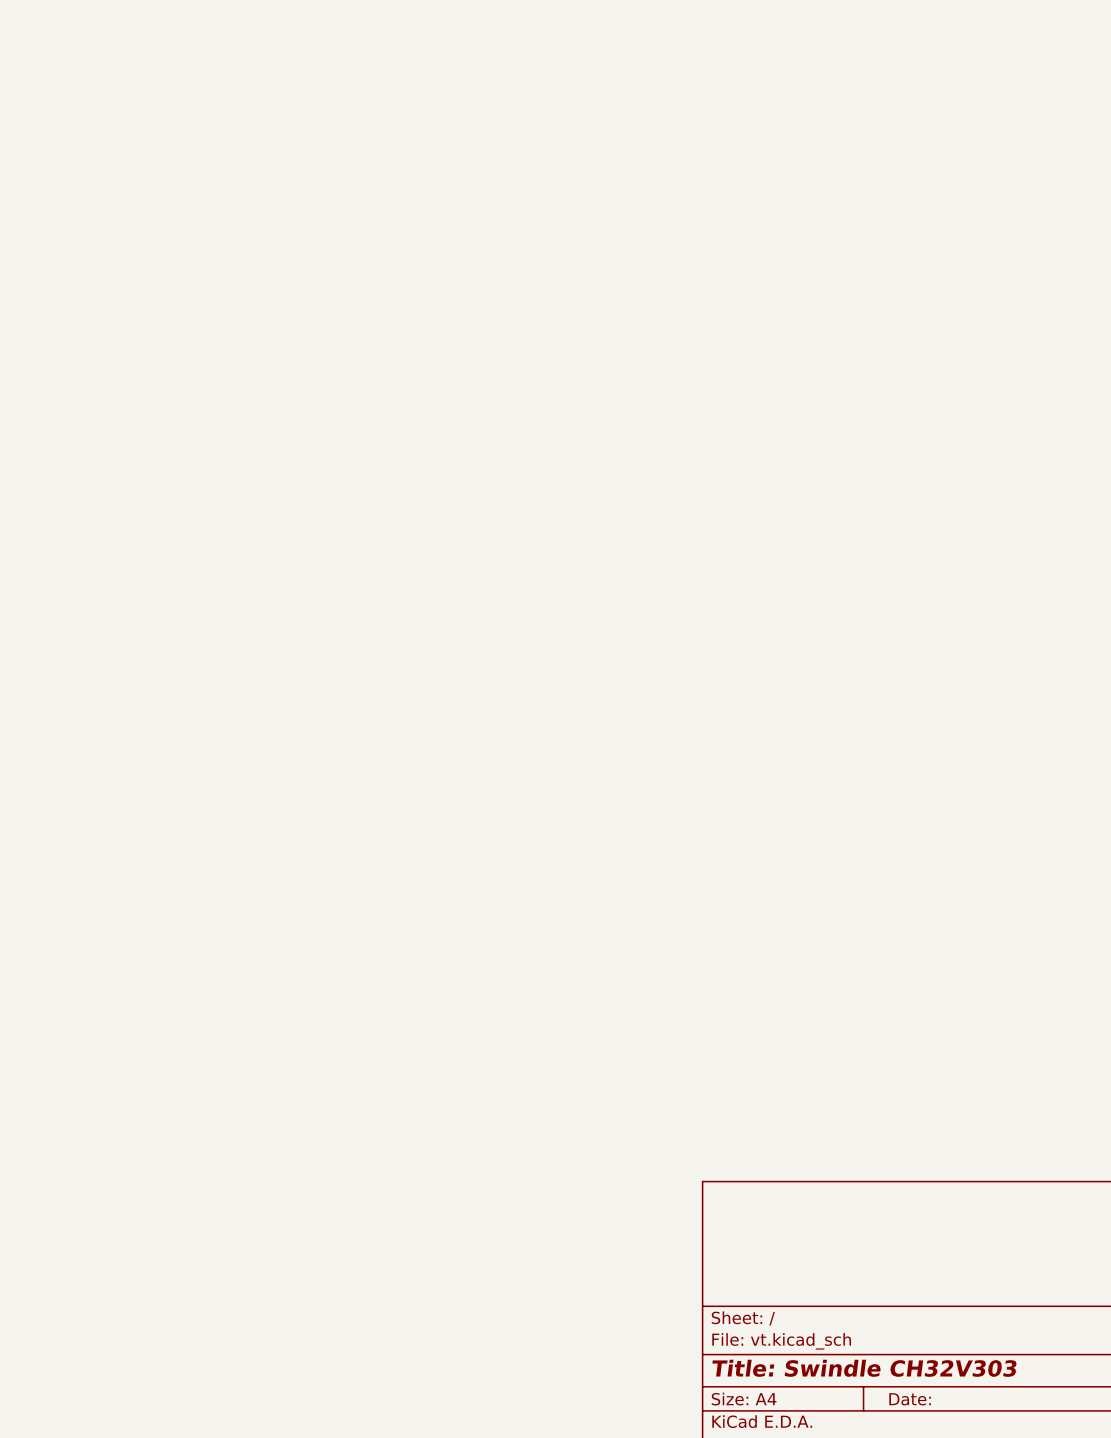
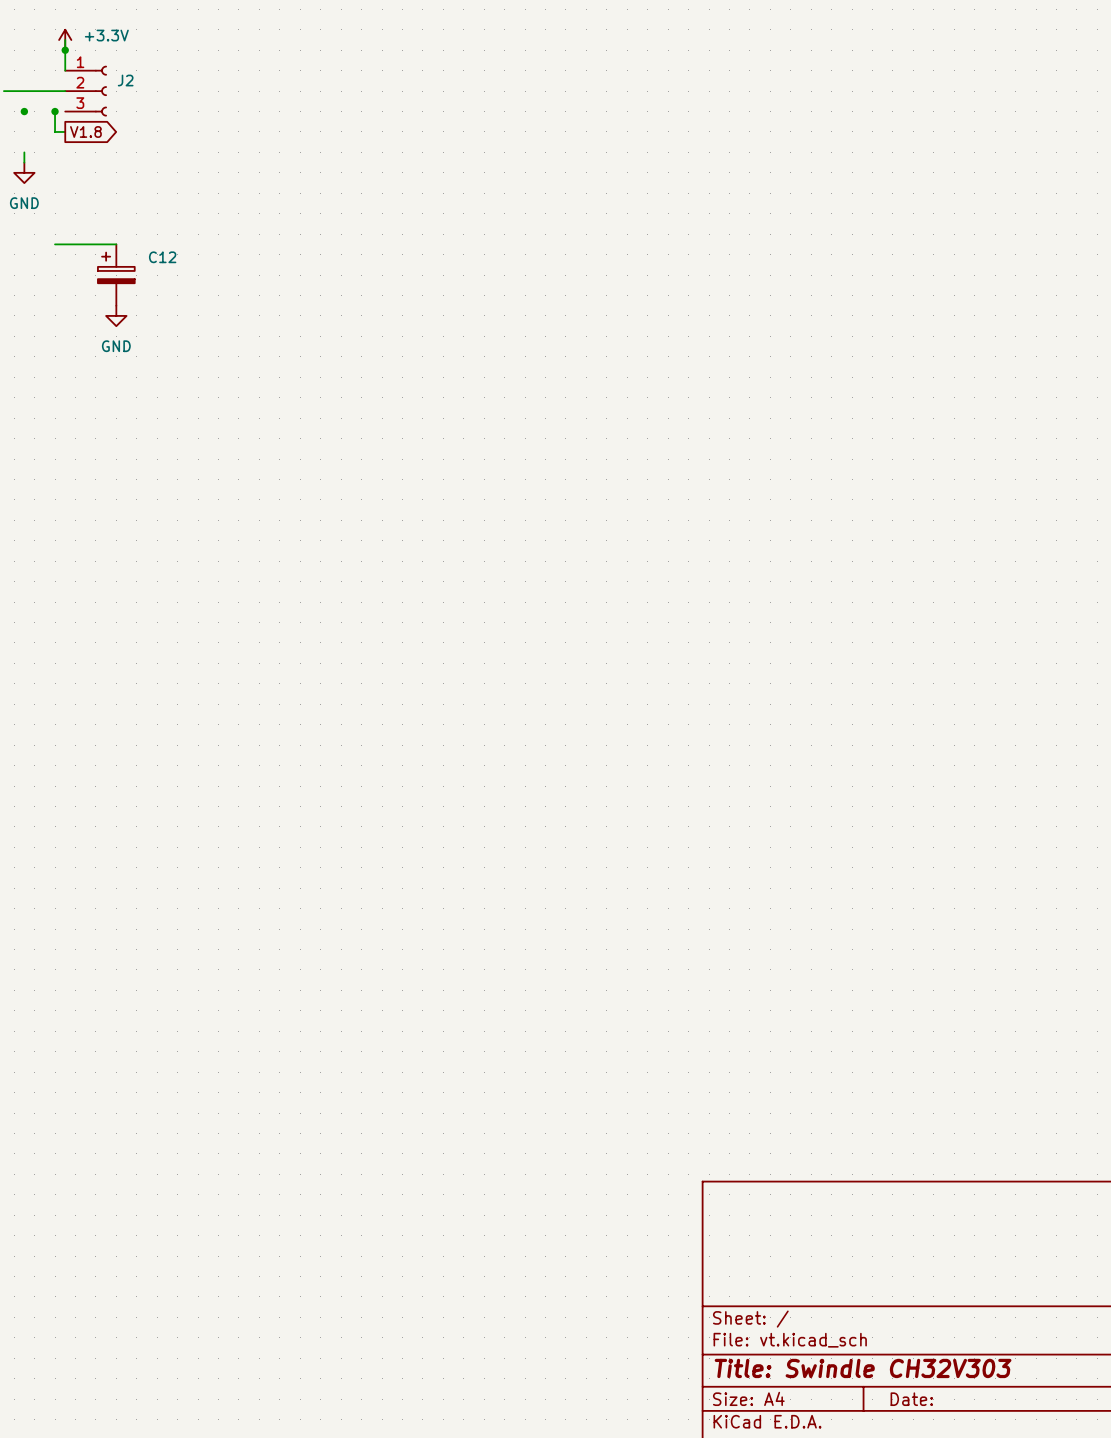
wire: none -> (65, 40) (65, 70)
power symbol: none -> +3.3V (65, 40)
junction: none -> (65, 50)
wire: none -> (3, 91) (65, 91)
J2: none -> (85, 91)
junction: none -> (24, 111)
wire: none -> (55, 111) (55, 131) (65, 131)
junction: none -> (55, 111)
global label: none -> V1.8 (85, 131)
wire: none -> (24, 152) (24, 162)
power symbol: none -> GND (24, 172)
wire: none -> (55, 244) (116, 244)
C12: none -> (116, 275)
power symbol: none -> GND (116, 315)

